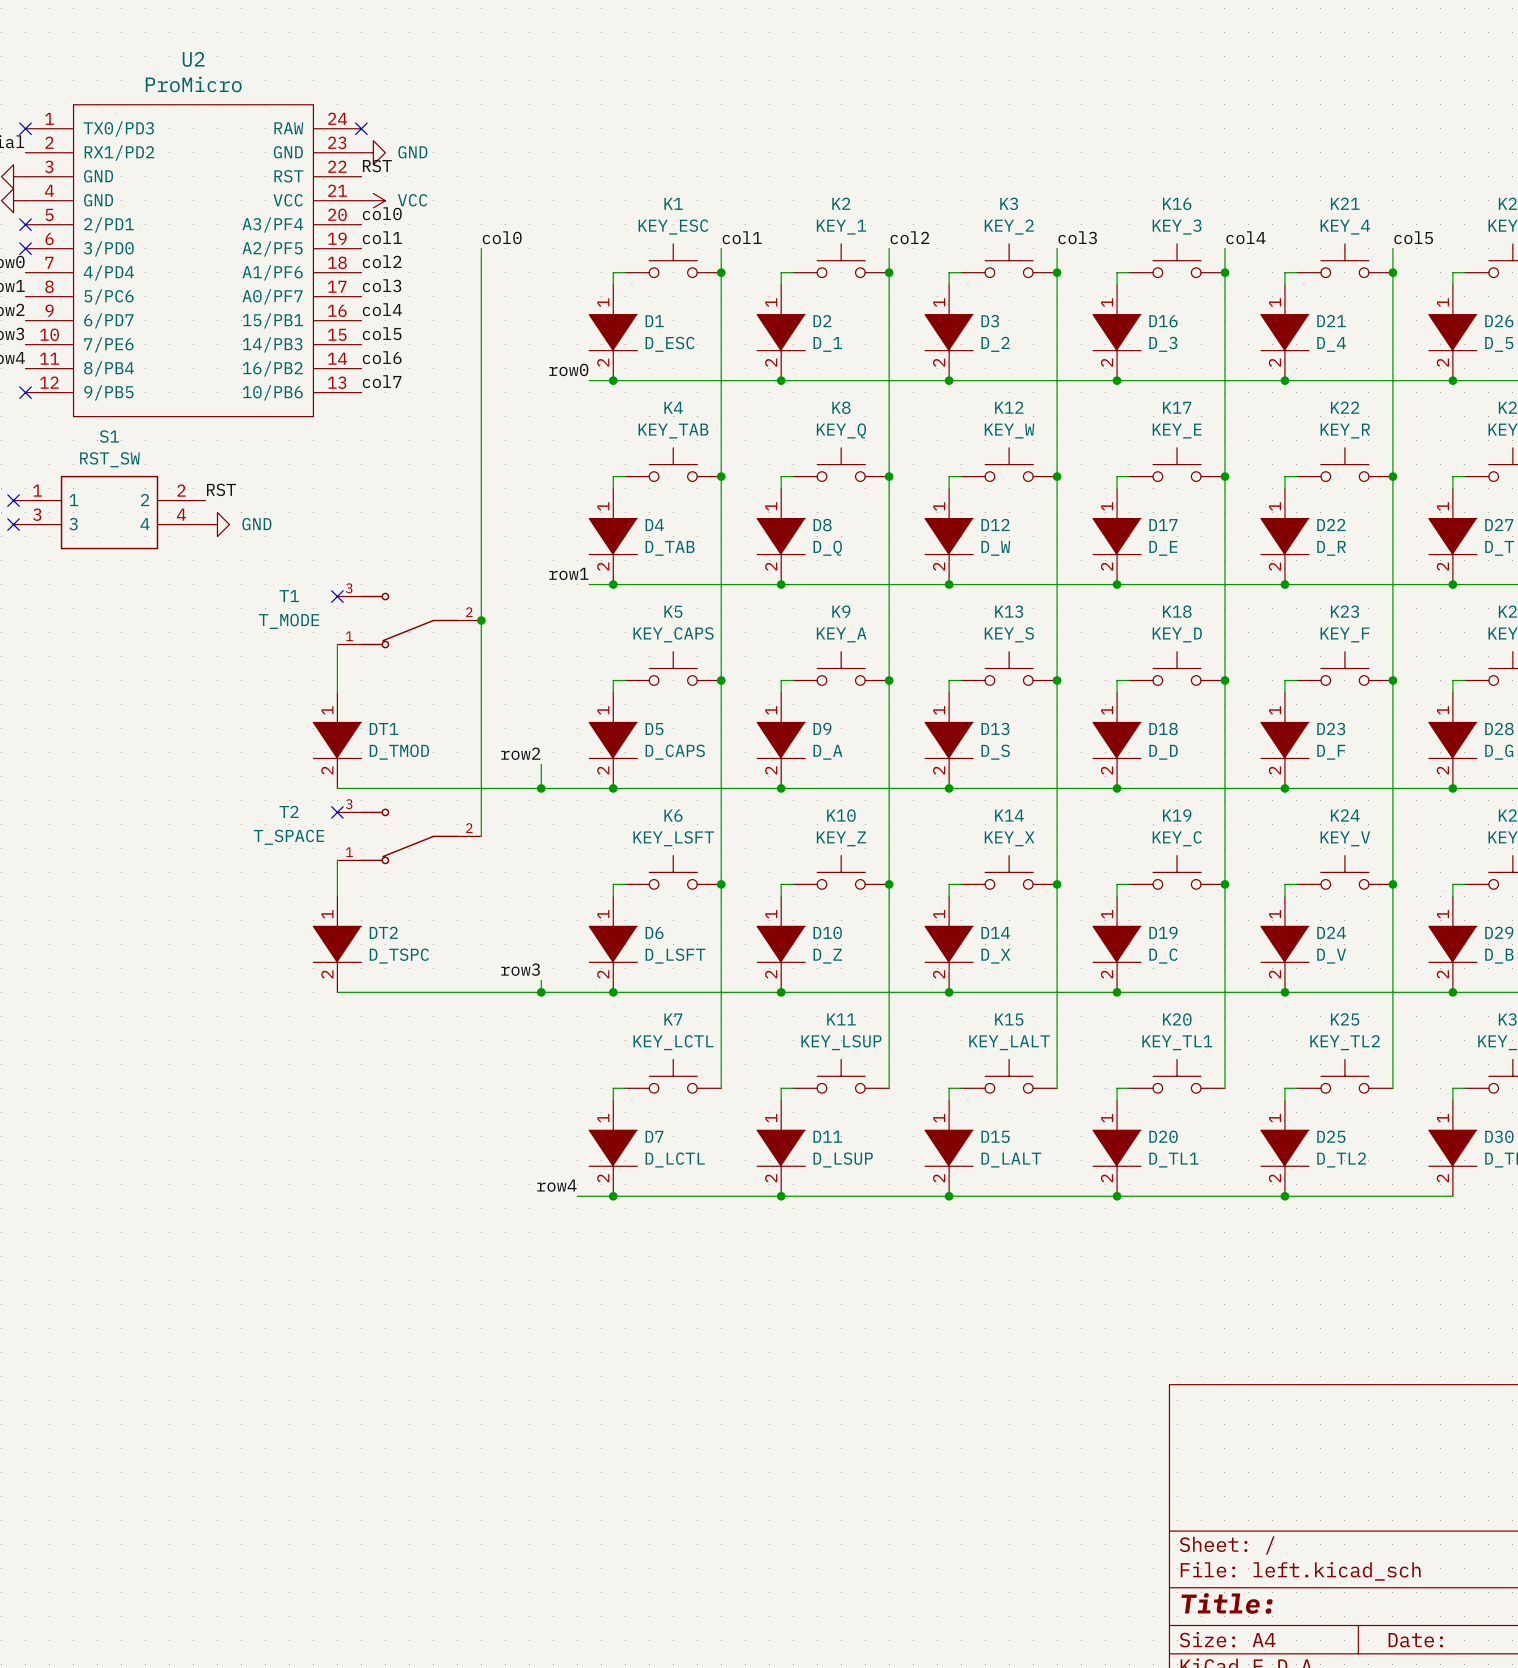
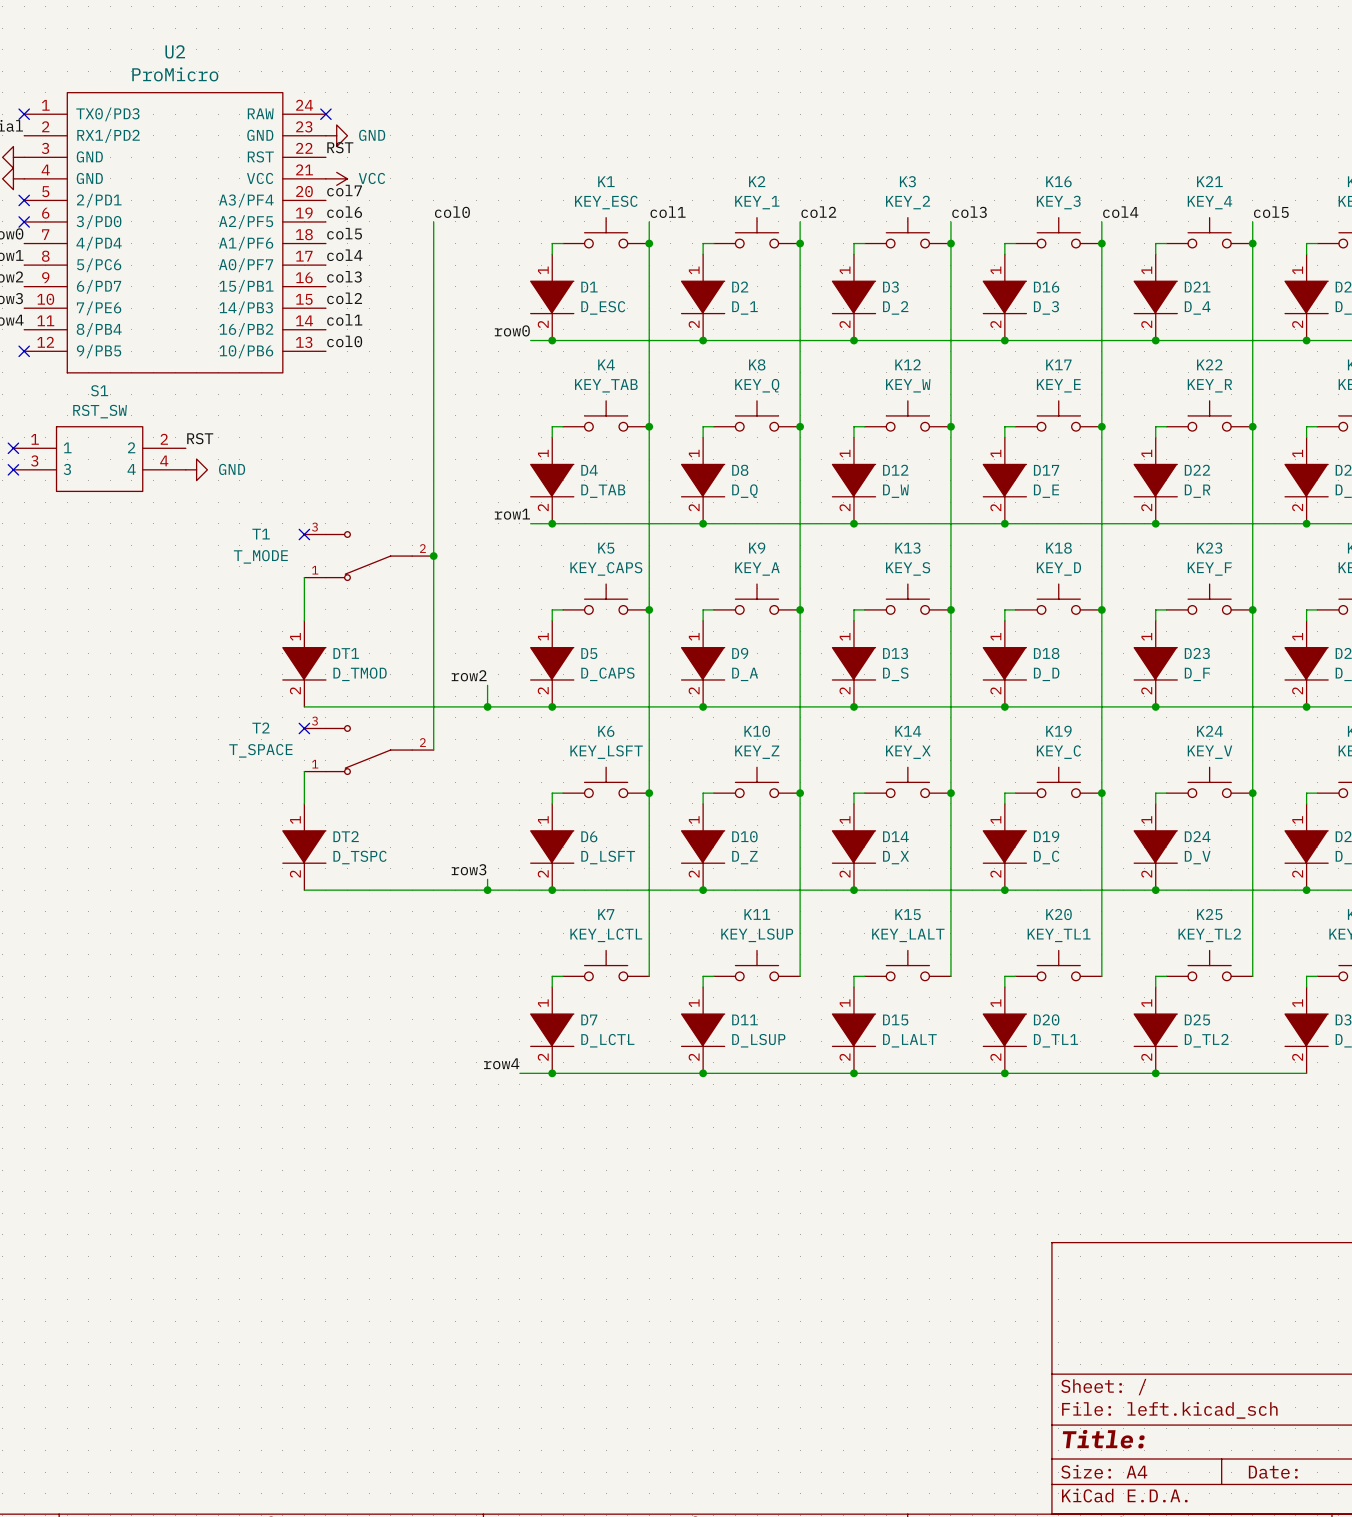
label: col0 (382, 213) -> col7 (344, 190)
label: col1 (382, 237) -> col6 (344, 212)
label: col2 (382, 261) -> col5 (344, 233)
label: col3 (382, 285) -> col4 (344, 255)
label: col4 (382, 309) -> col3 (344, 276)
label: col5 (382, 333) -> col2 (344, 298)
label: col6 (382, 357) -> col1 (344, 319)
label: col7 (382, 381) -> col0 (344, 341)

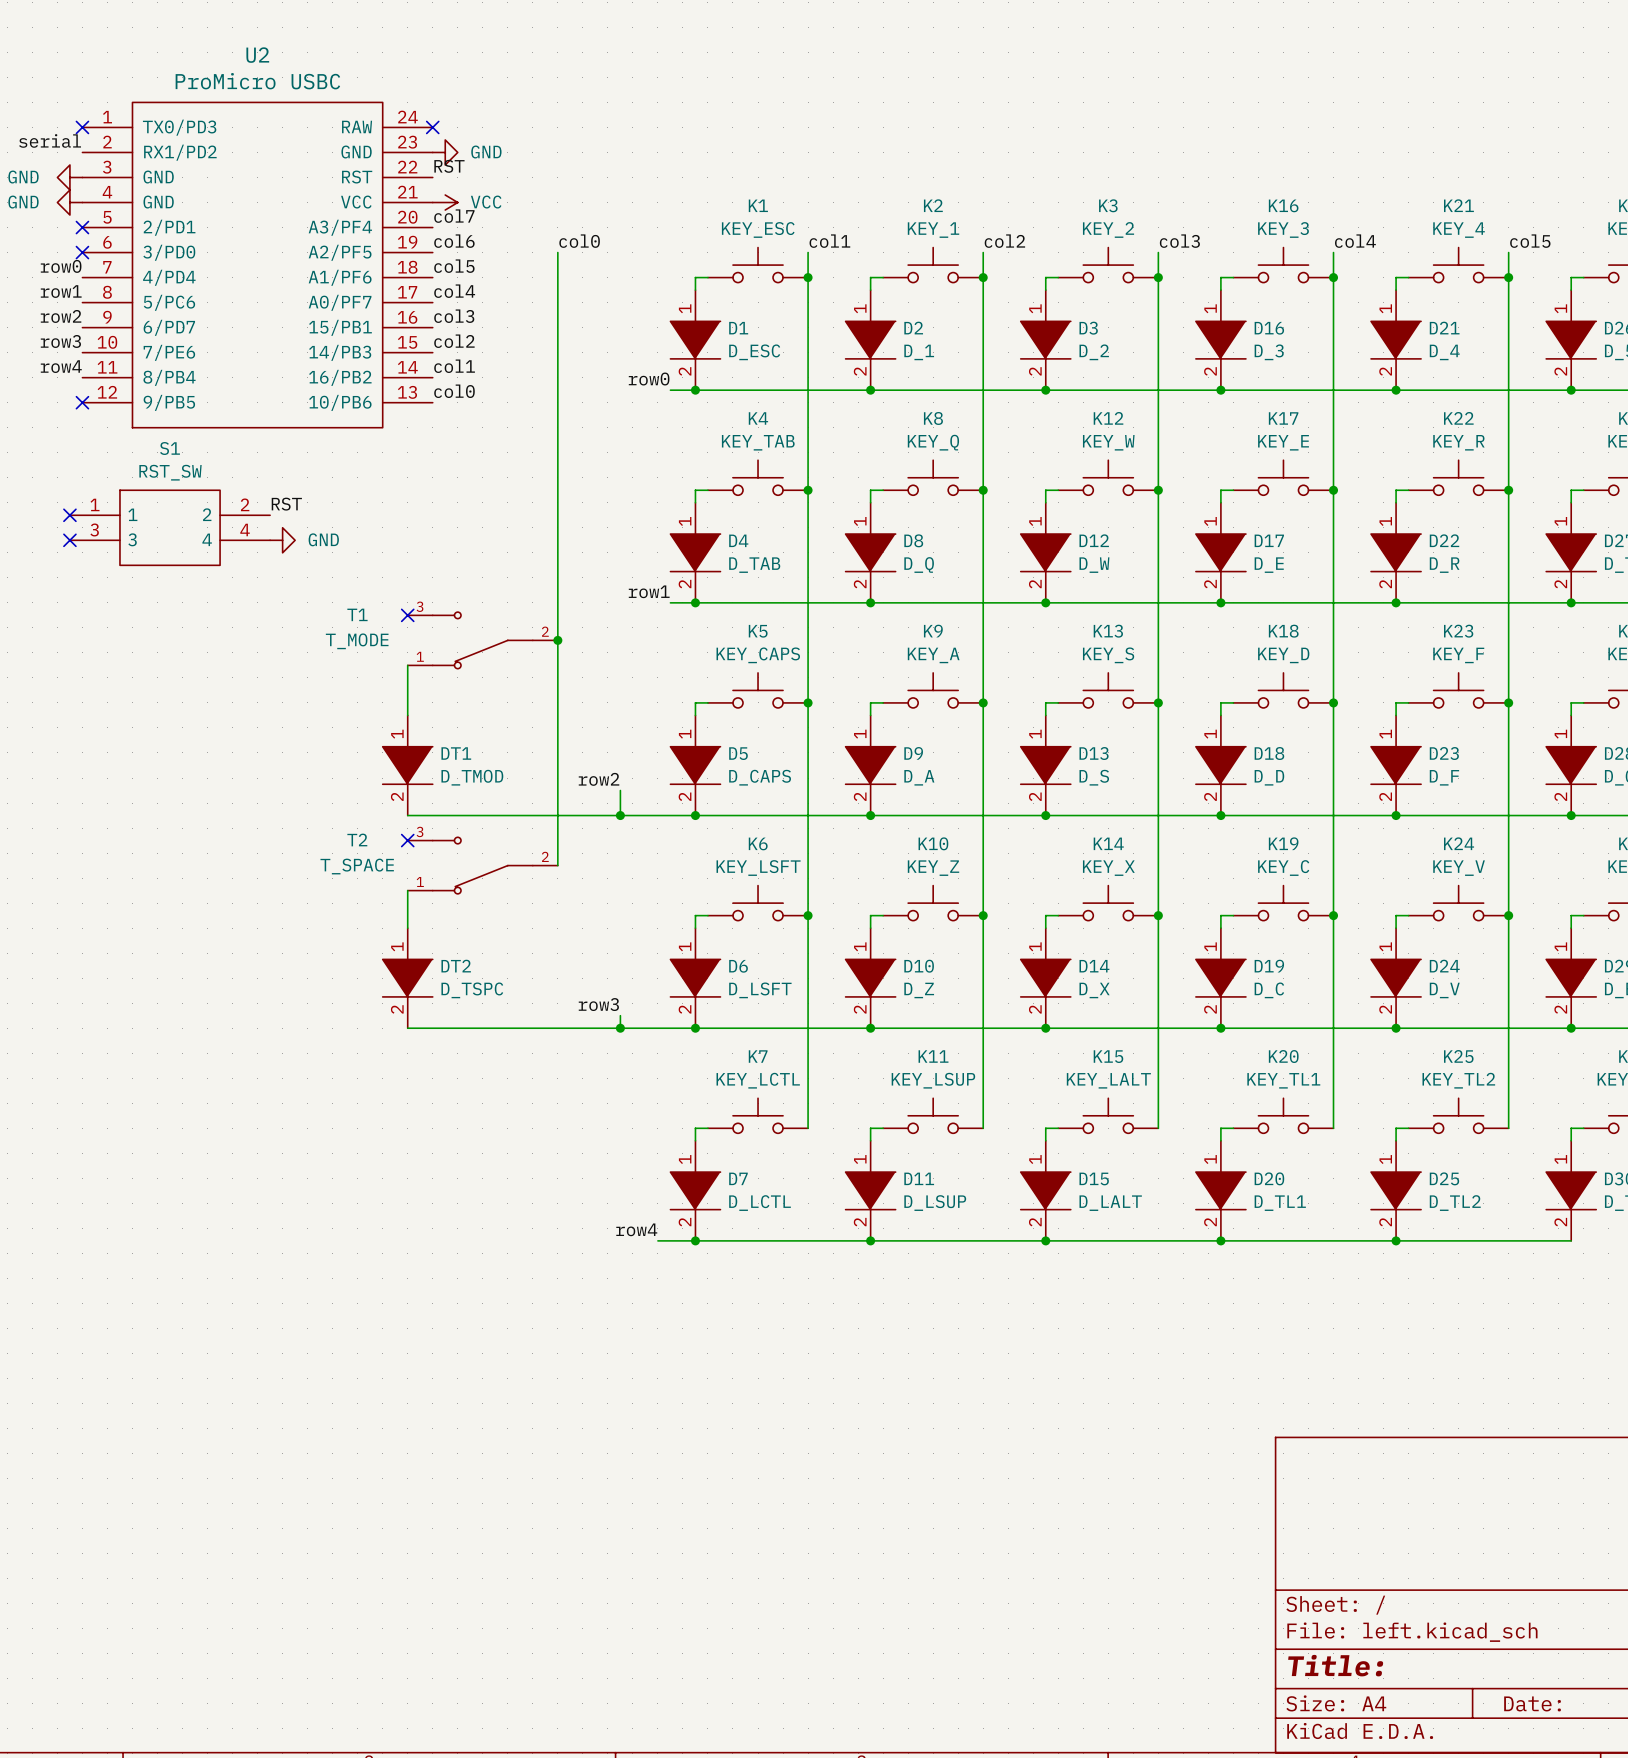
U2 value: ProMicro (175, 74) -> ProMicro USBC (257, 81)

